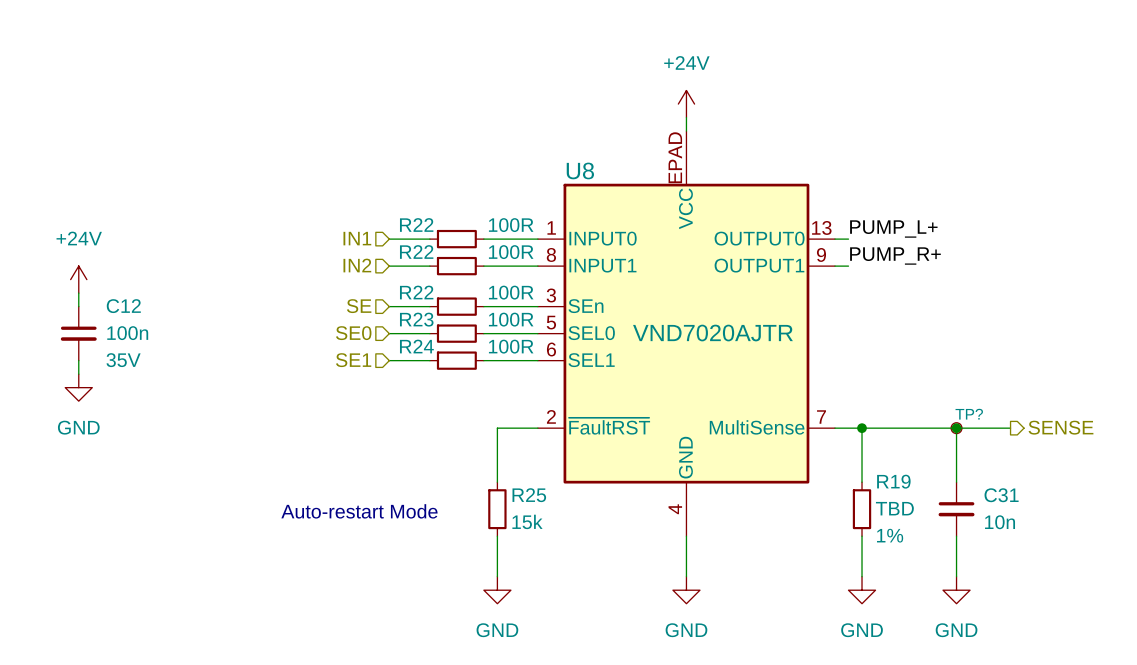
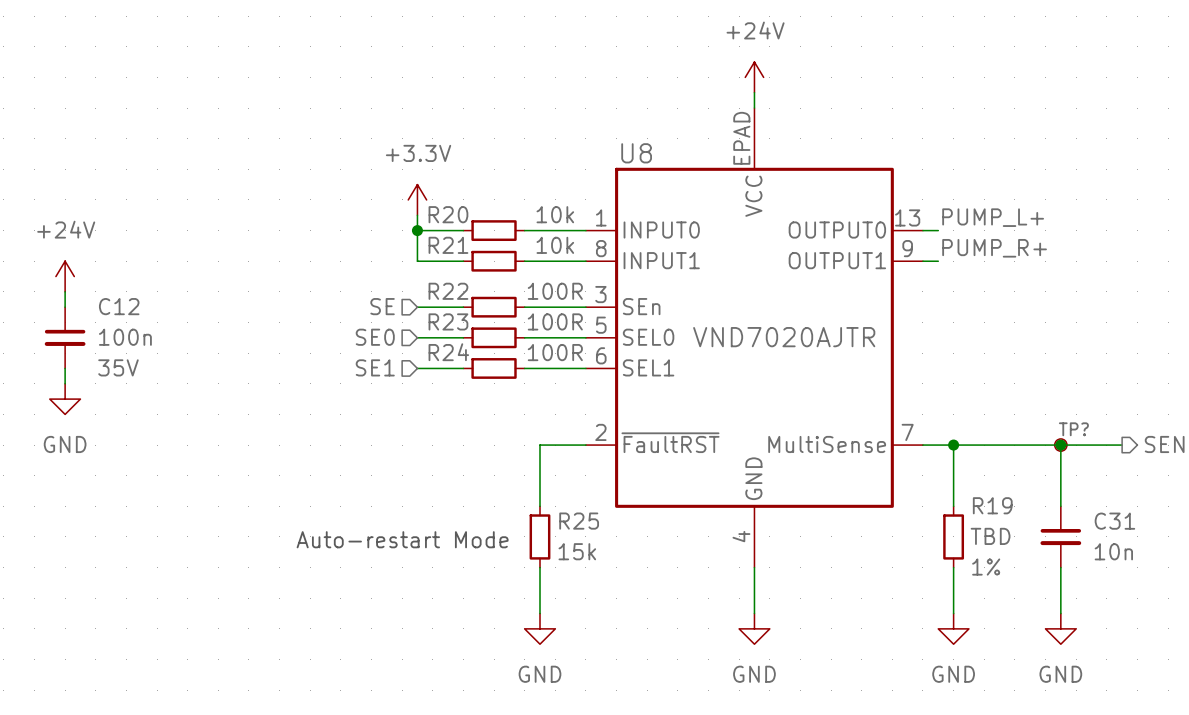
power symbol: none -> +3.3V (417, 199)
R22 name: R22 (416, 224) -> R20 (448, 214)
wire: none -> (417, 215) (417, 261)
R22 value: 100R (511, 225) -> 10k (555, 214)
hierarchical label: IN1 (357, 238) -> none
junction: none -> (417, 230)
R22 name: R22 (416, 252) -> R21 (448, 245)
R22 value: 100R (511, 252) -> 10k (555, 245)
hierarchical label: IN2 (357, 265) -> none

